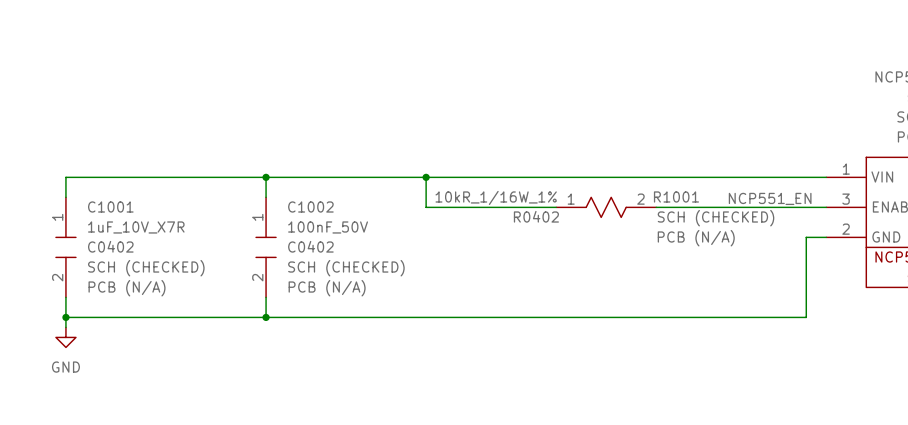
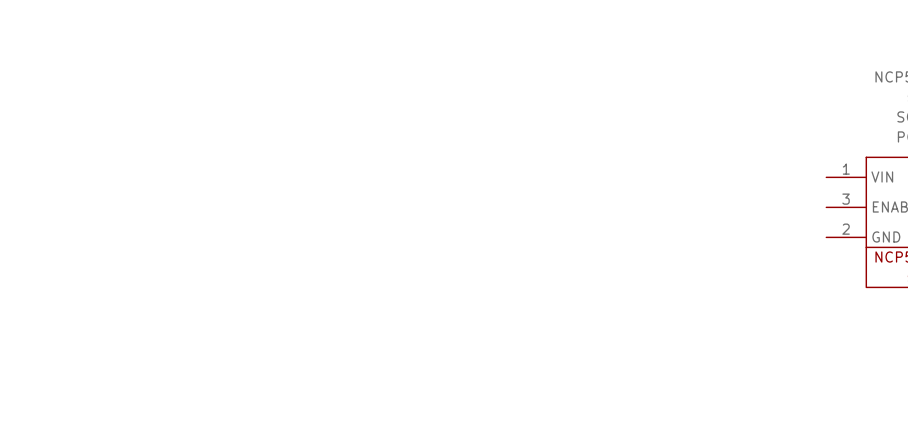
wire: (266, 177) (266, 197) -> none
junction: (266, 177) -> none
wire: (426, 177) (426, 207) (556, 207) -> none
junction: (426, 177) -> none
wire: (826, 177) (65, 177) (65, 197) -> none
label: NCP551_EN (770, 198) -> none
R1001: 10kR_1/16W_1% (606, 207) -> none
wire: (656, 207) (826, 207) -> none
wire: (826, 237) (806, 237) (806, 317) (65, 317) -> none
C1001: 1uF_10V_X7R (65, 247) -> none
C1002: 100nF_50V (266, 247) -> none
wire: (65, 297) (65, 327) -> none
wire: (266, 297) (266, 317) -> none
junction: (65, 317) -> none
junction: (266, 317) -> none
power symbol: GND (65, 337) -> none

